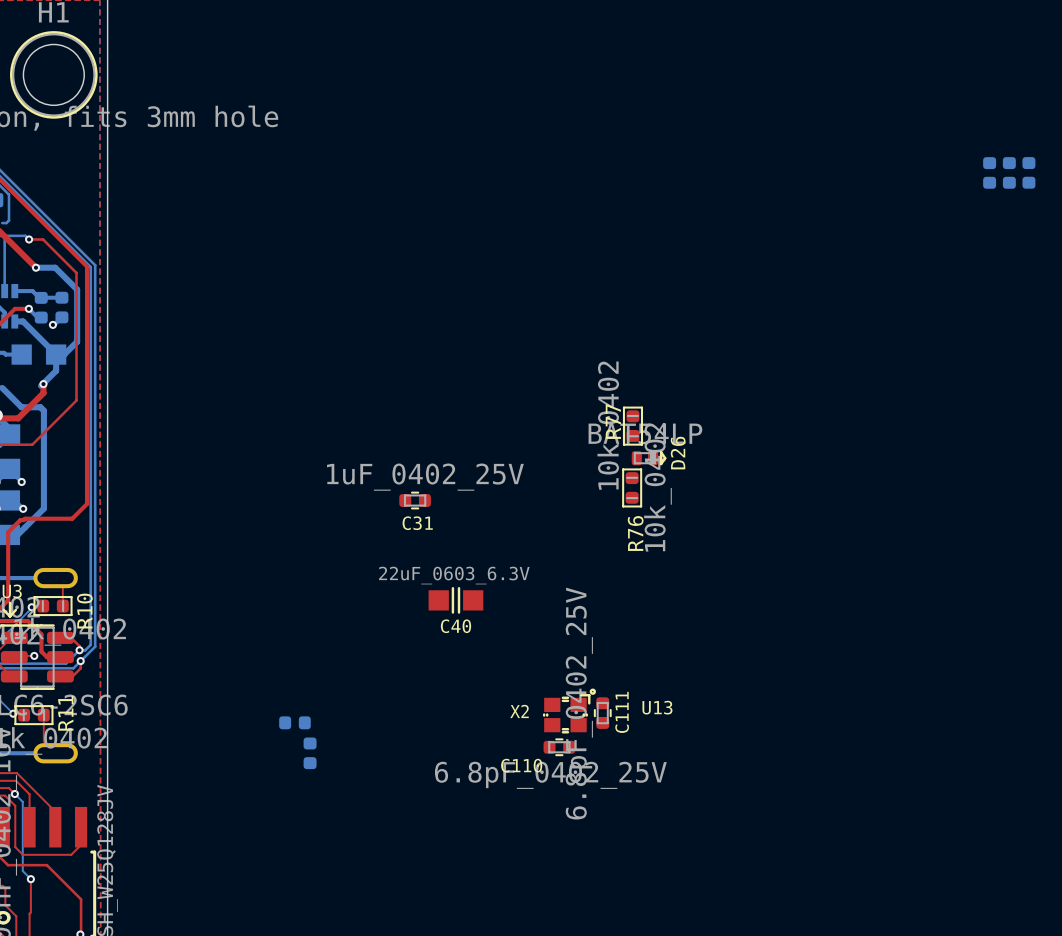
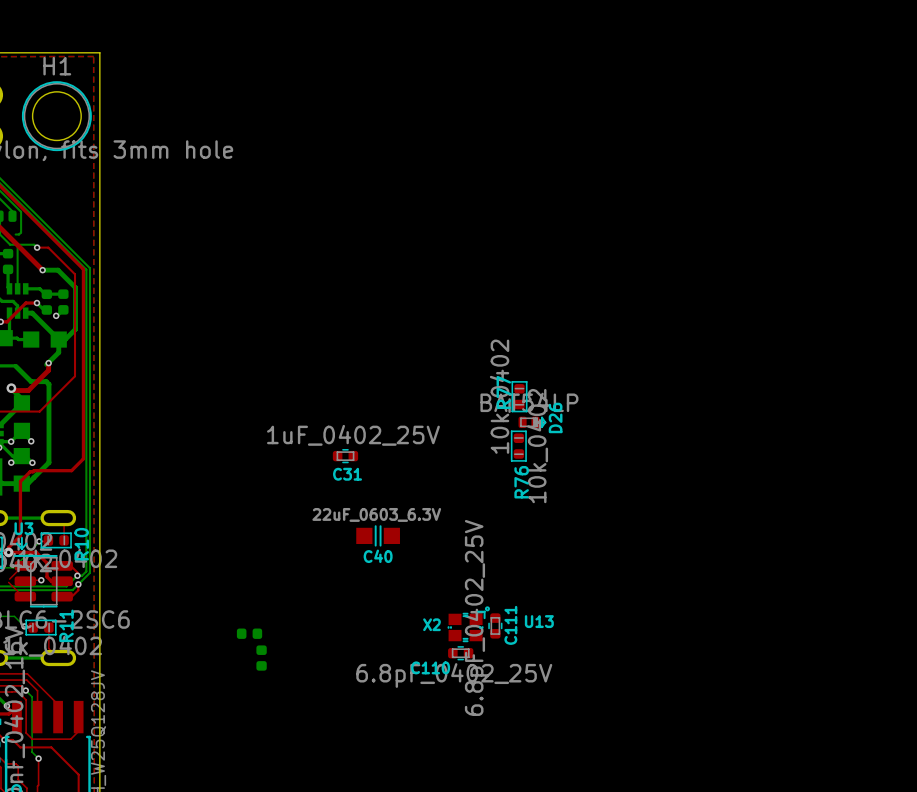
part: (989, 172) -> none
part: (1009, 172) -> none
part: (1028, 172) -> none

